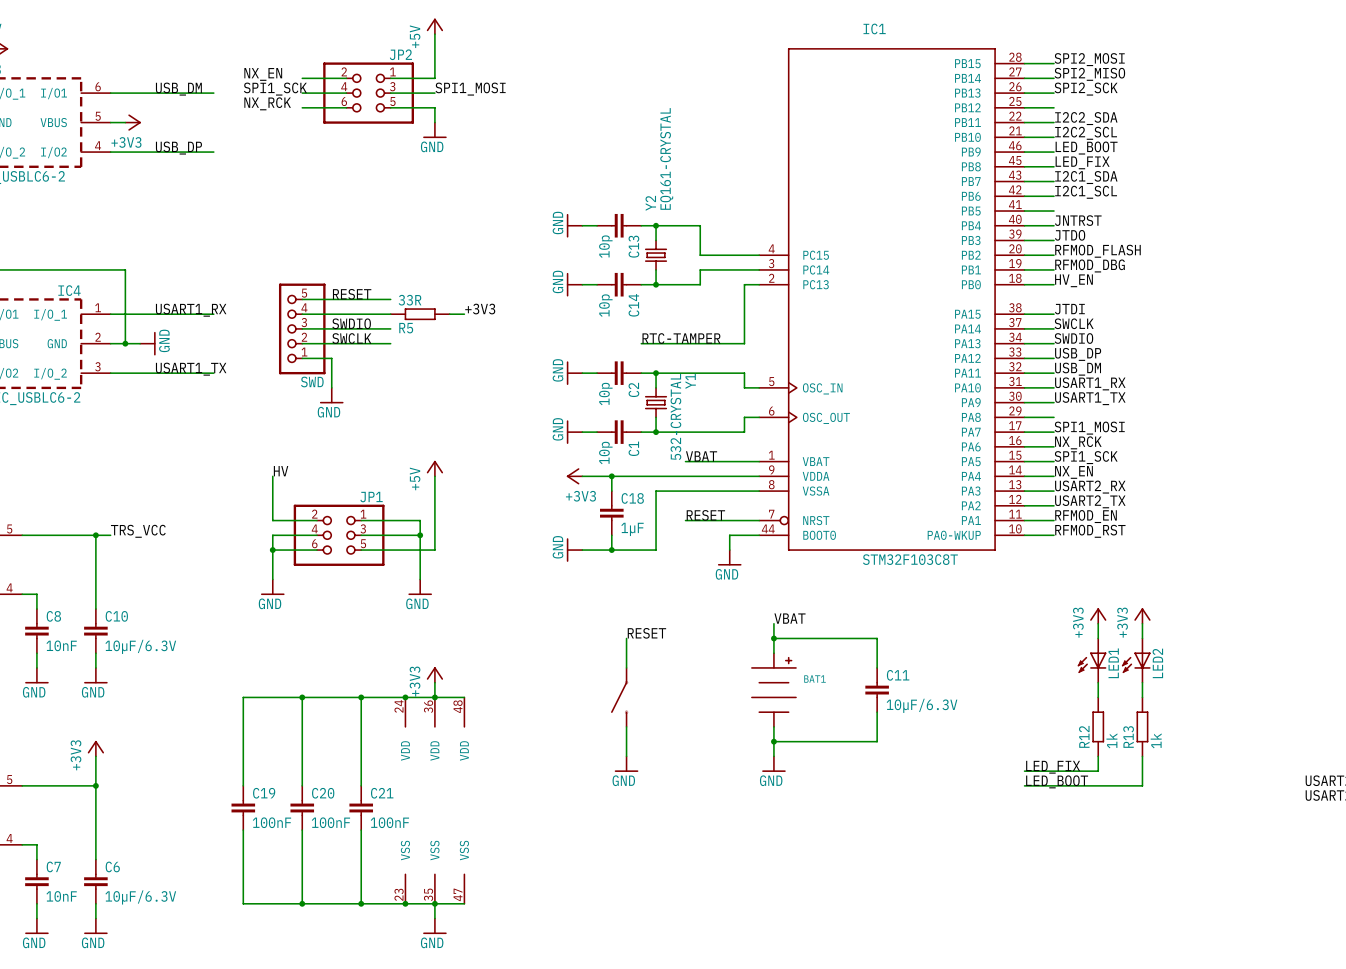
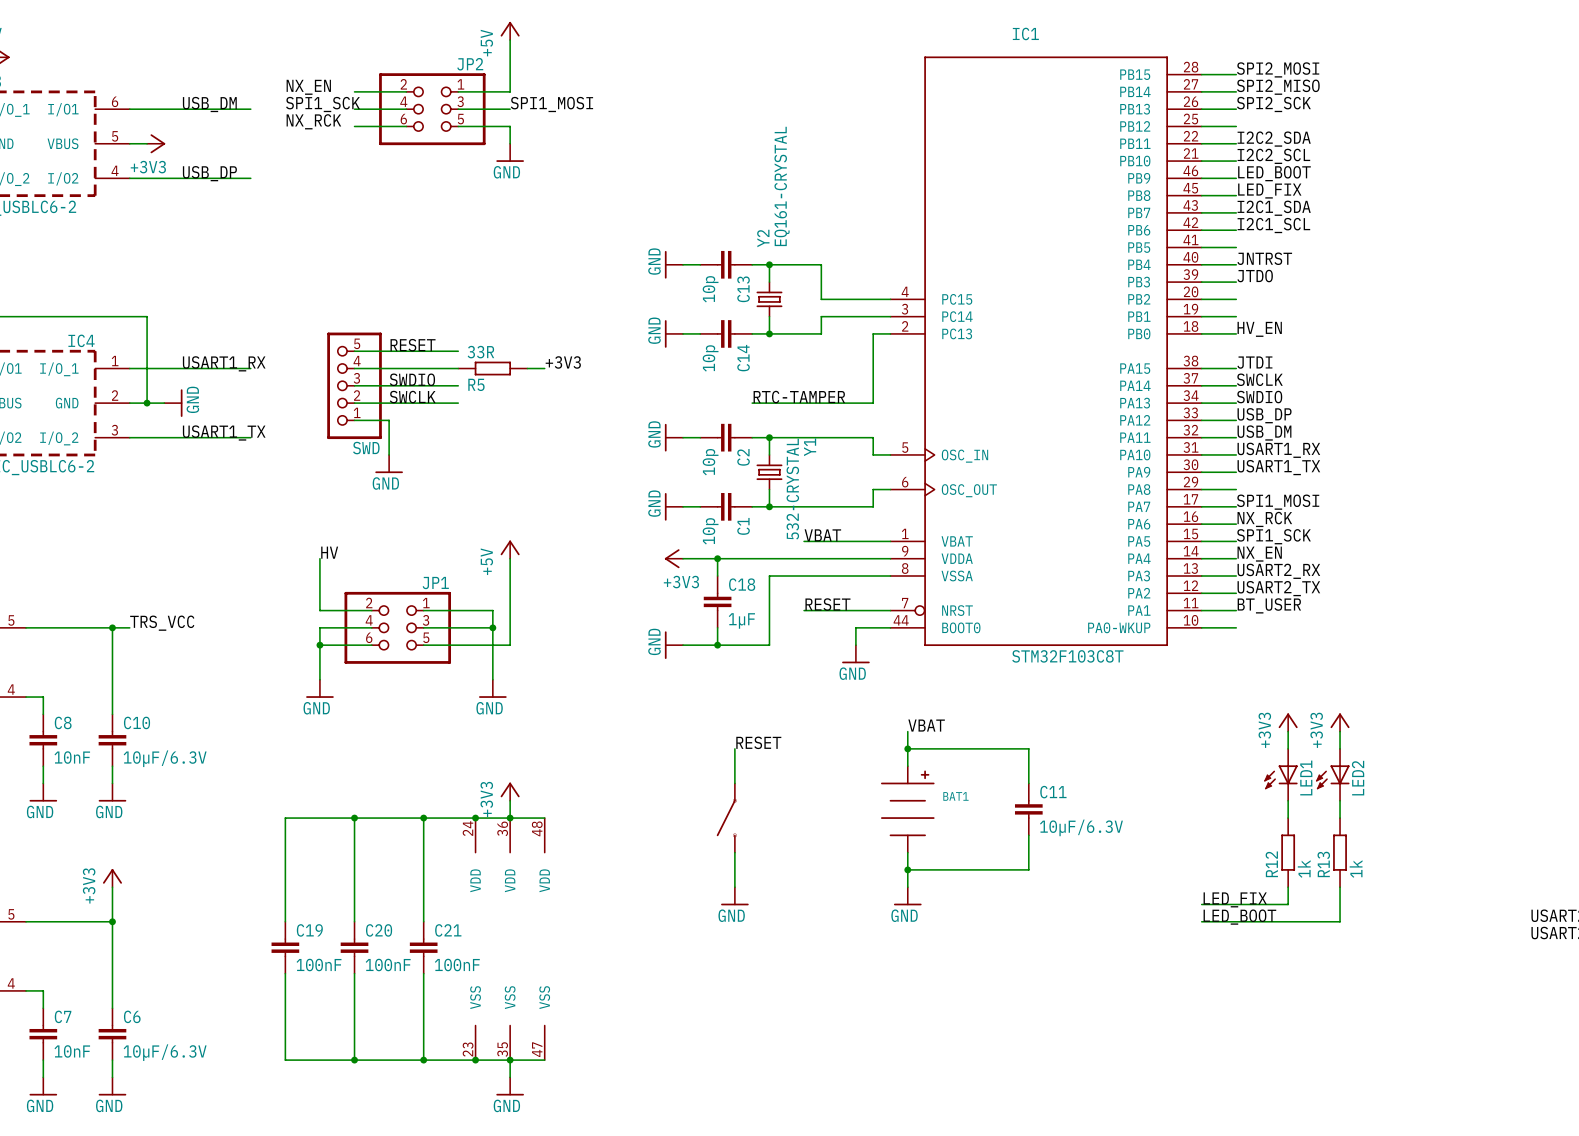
label: RFMOD_FLASH (1097, 251) -> none
label: RFMOD_DBG (1090, 265) -> none
label: RFMOD_EN (1086, 516) -> BT_USER (1269, 605)
label: RFMOD_RST (1090, 531) -> none

